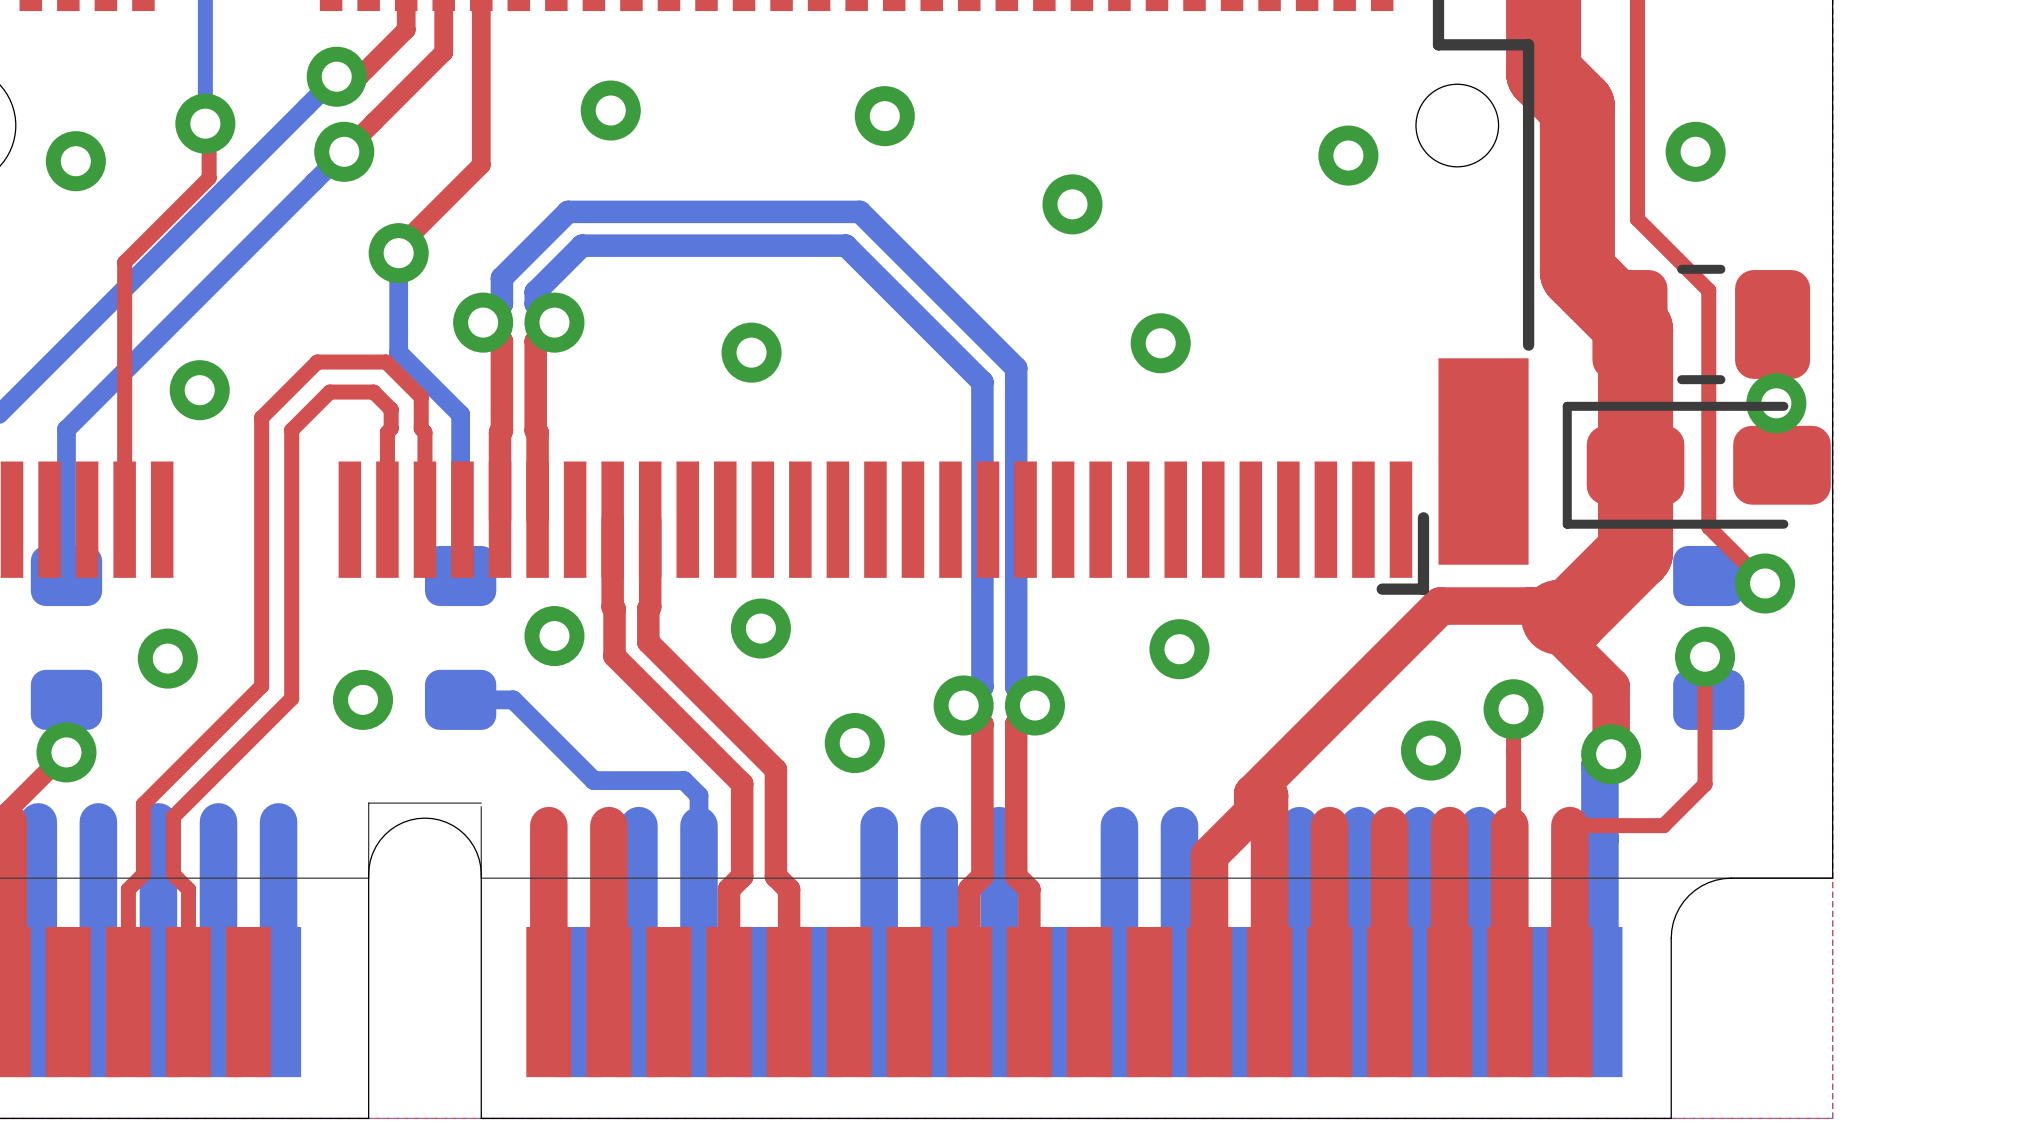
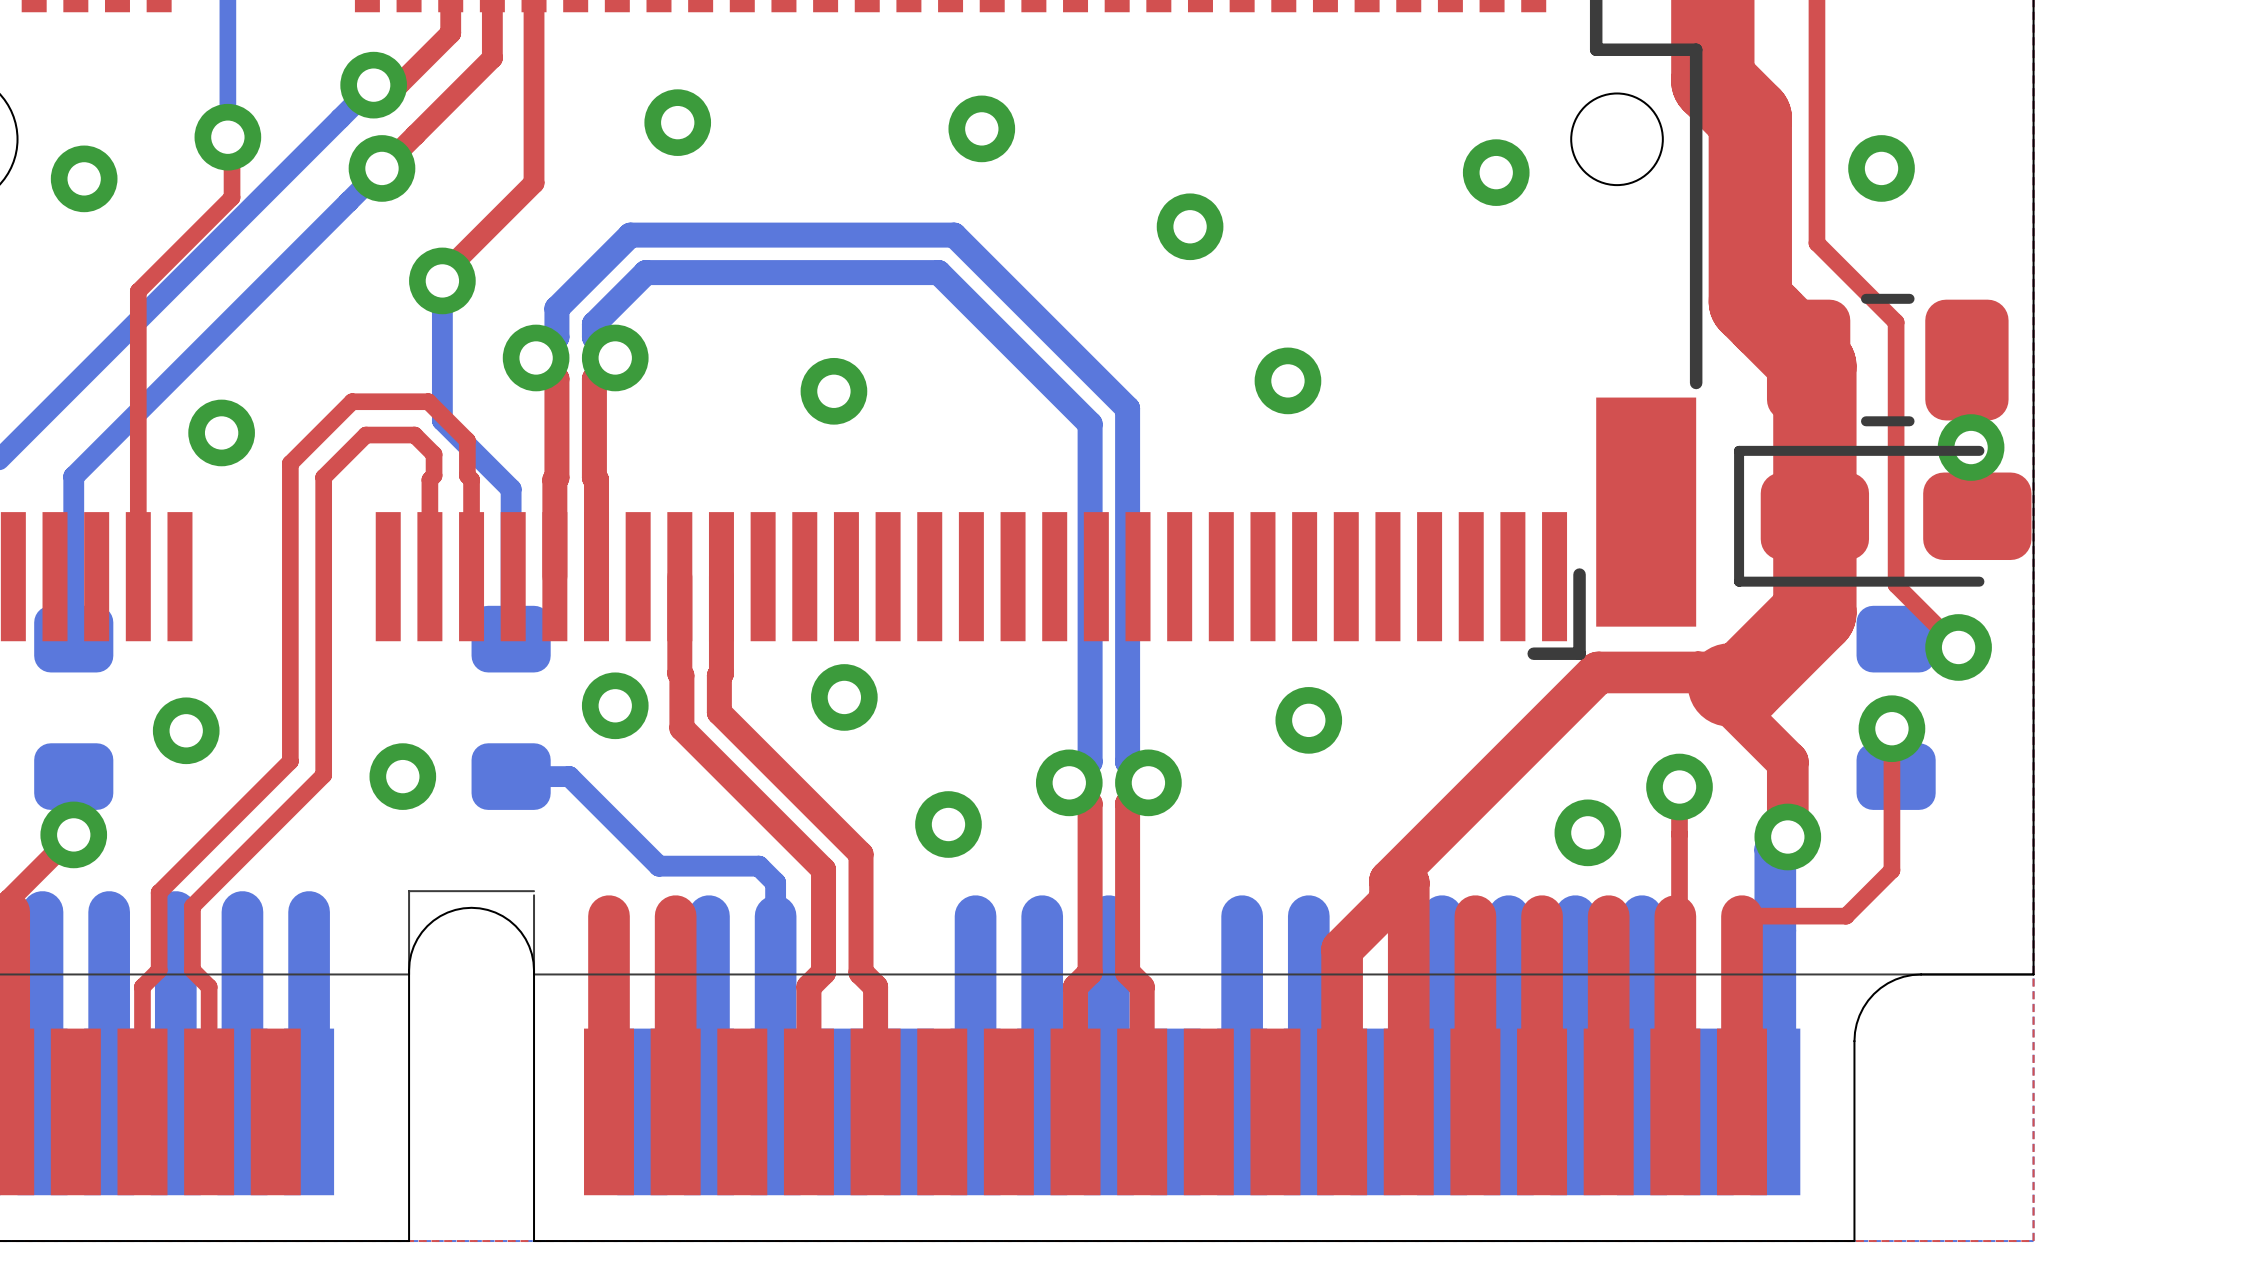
bottom track: (398, 352) (460, 414) (460, 440) -> (442, 391) (442, 420) (511, 489)

